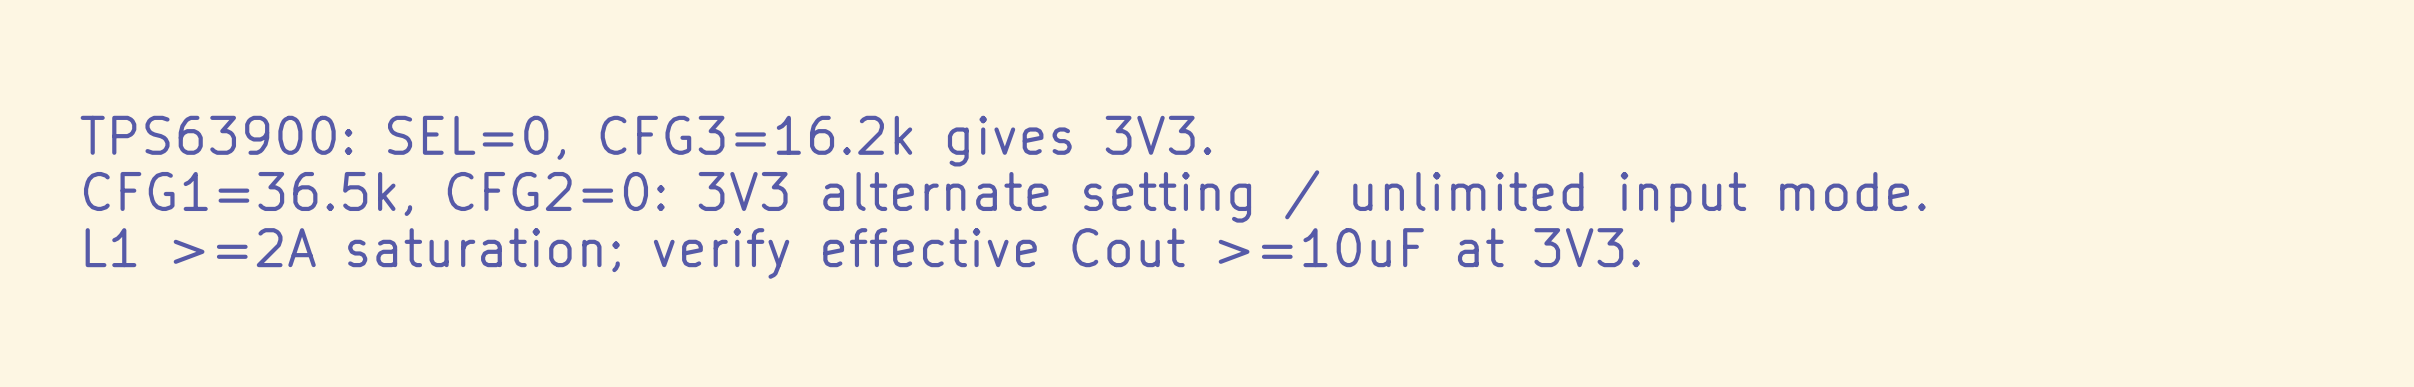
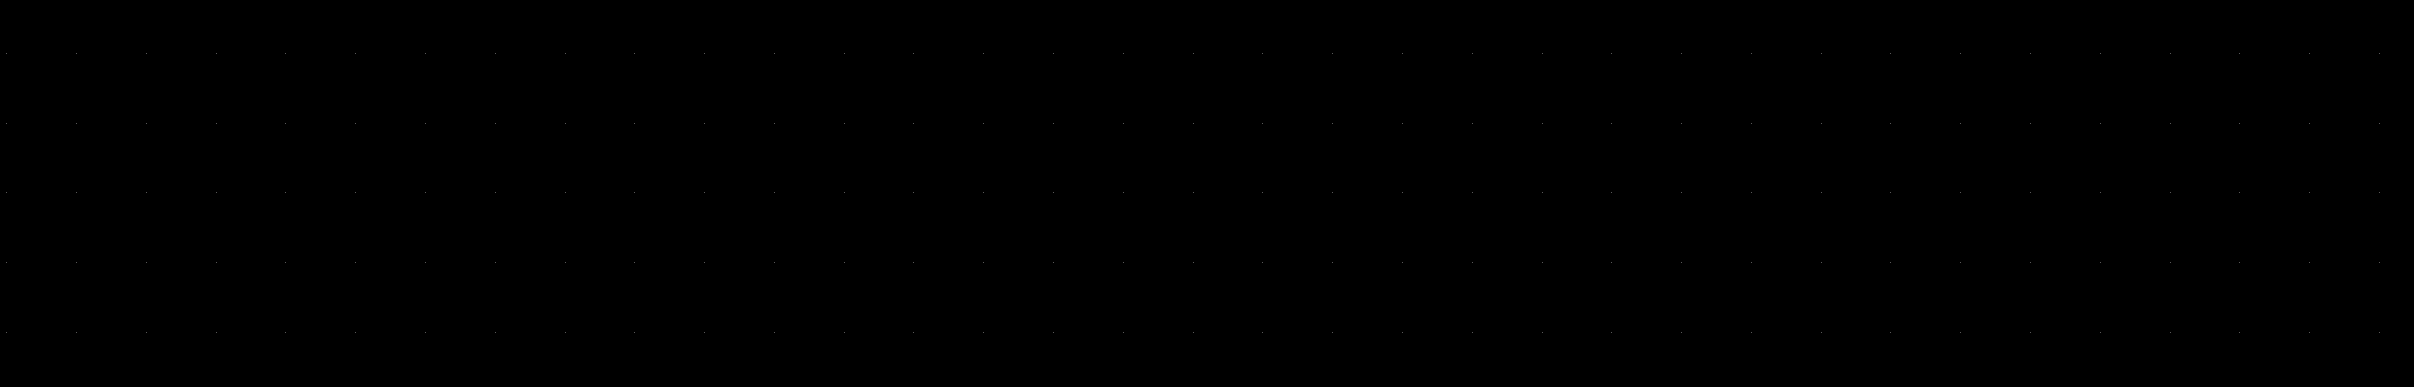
text: TPS63900: SEL=0, CFG3=16.2k gives 3V3. (645, 141) -> none
text: CFG1=36.5k, CFG2=0: 3V3 alternate setting / unlimited input mode. (1004, 196) -> none
text: L1 >=2A saturation; verify effective Cout >=10uF at 3V3. (862, 253) -> none

